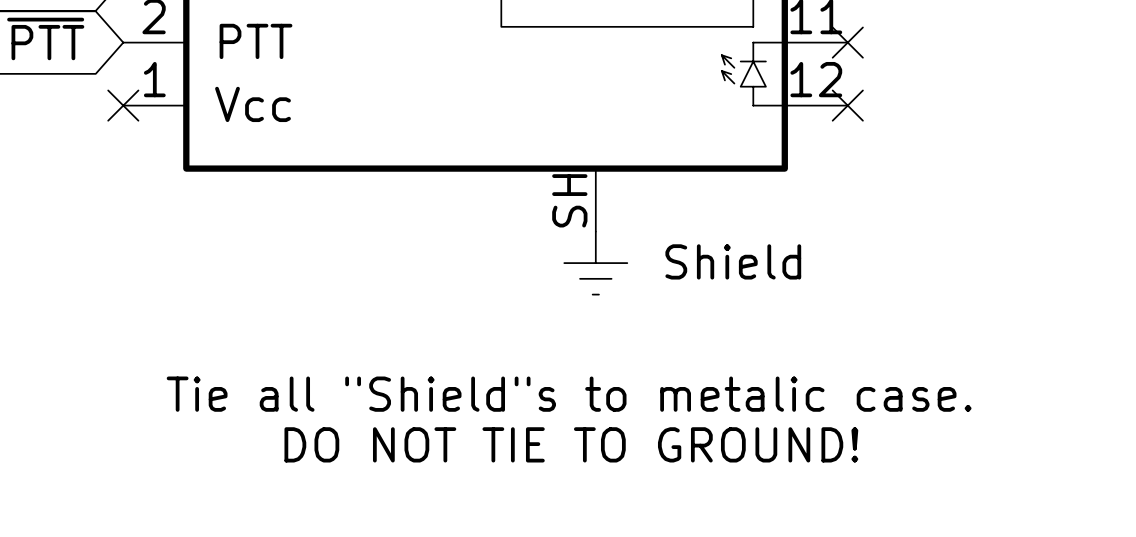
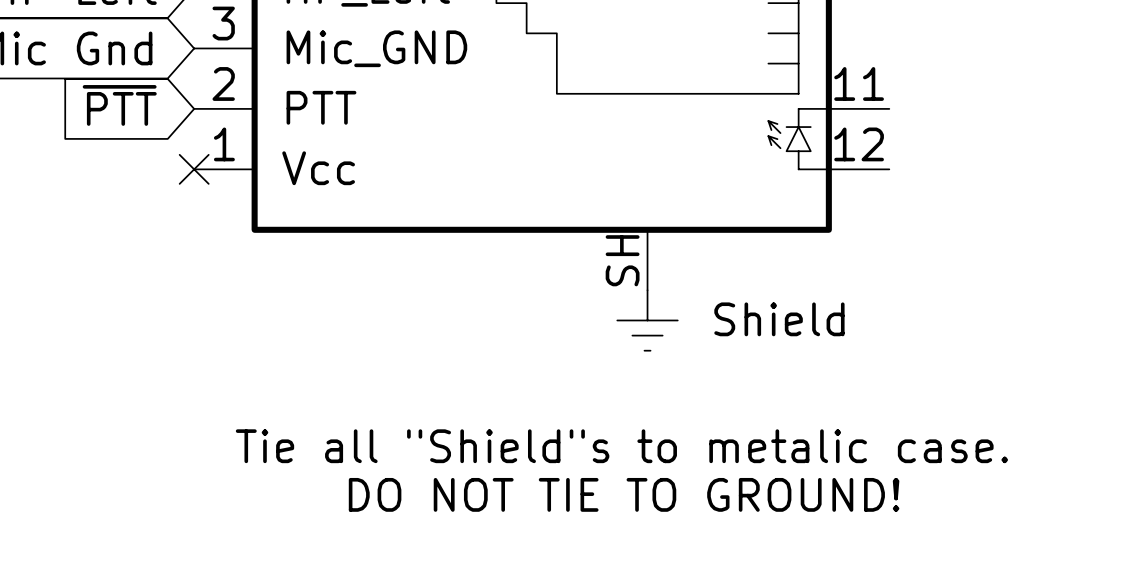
no-connect mark: (847, 42) -> none
no-connect mark: (847, 105) -> none

